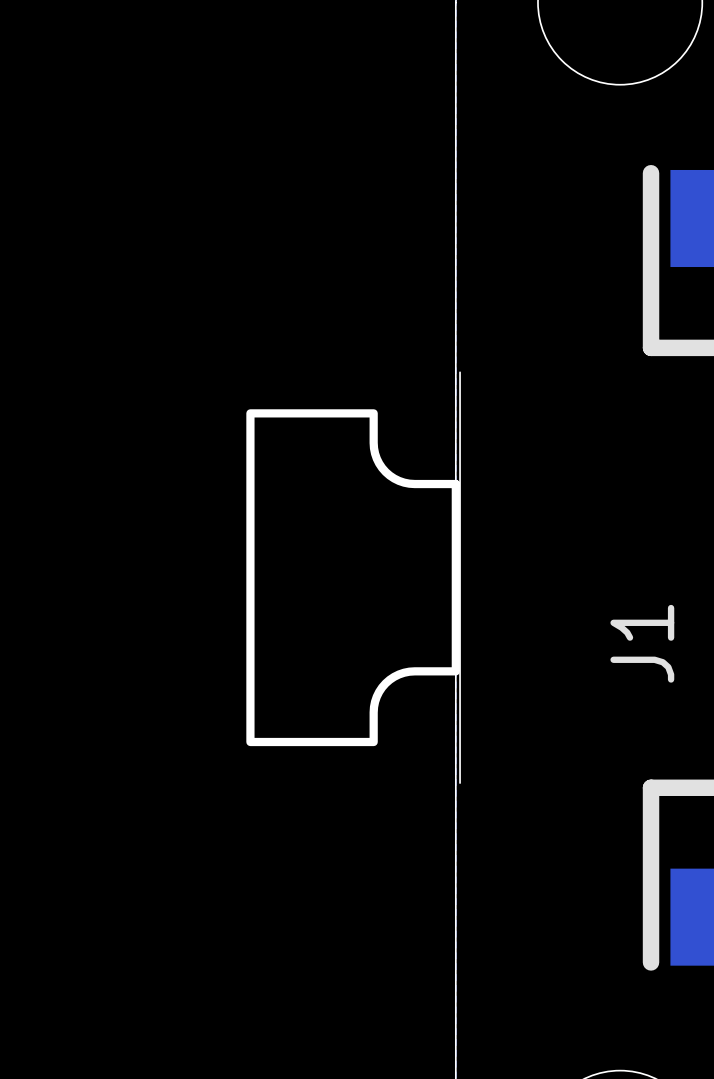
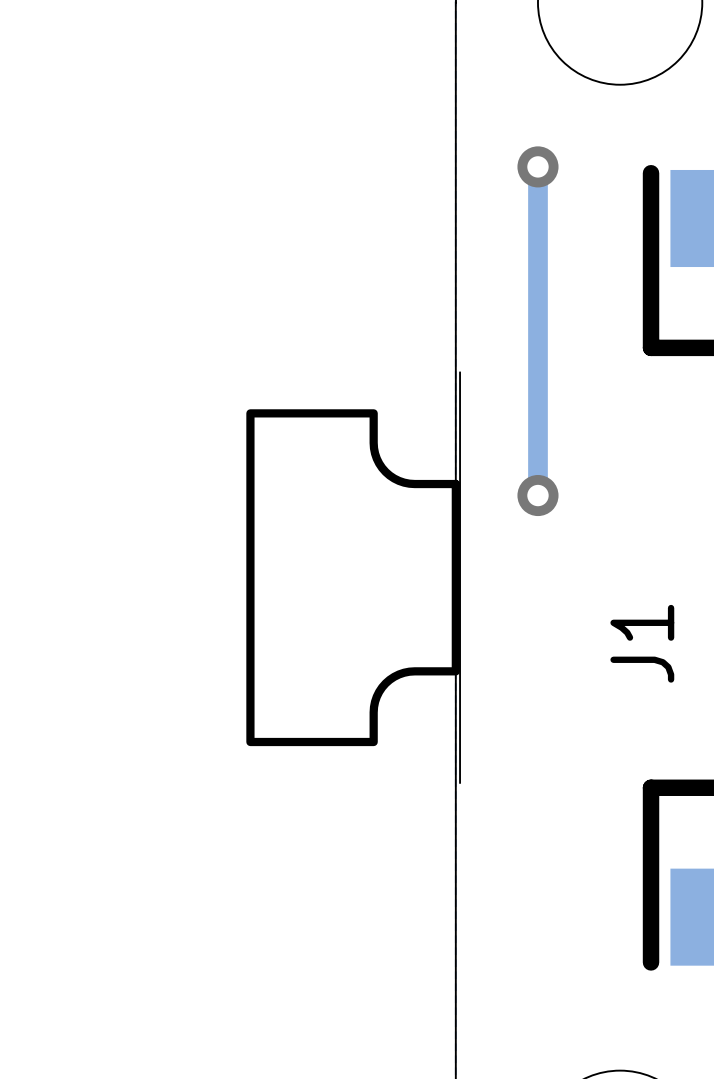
track: none -> (537, 166) (537, 495)
via: none -> (537, 166)
via: none -> (537, 495)

